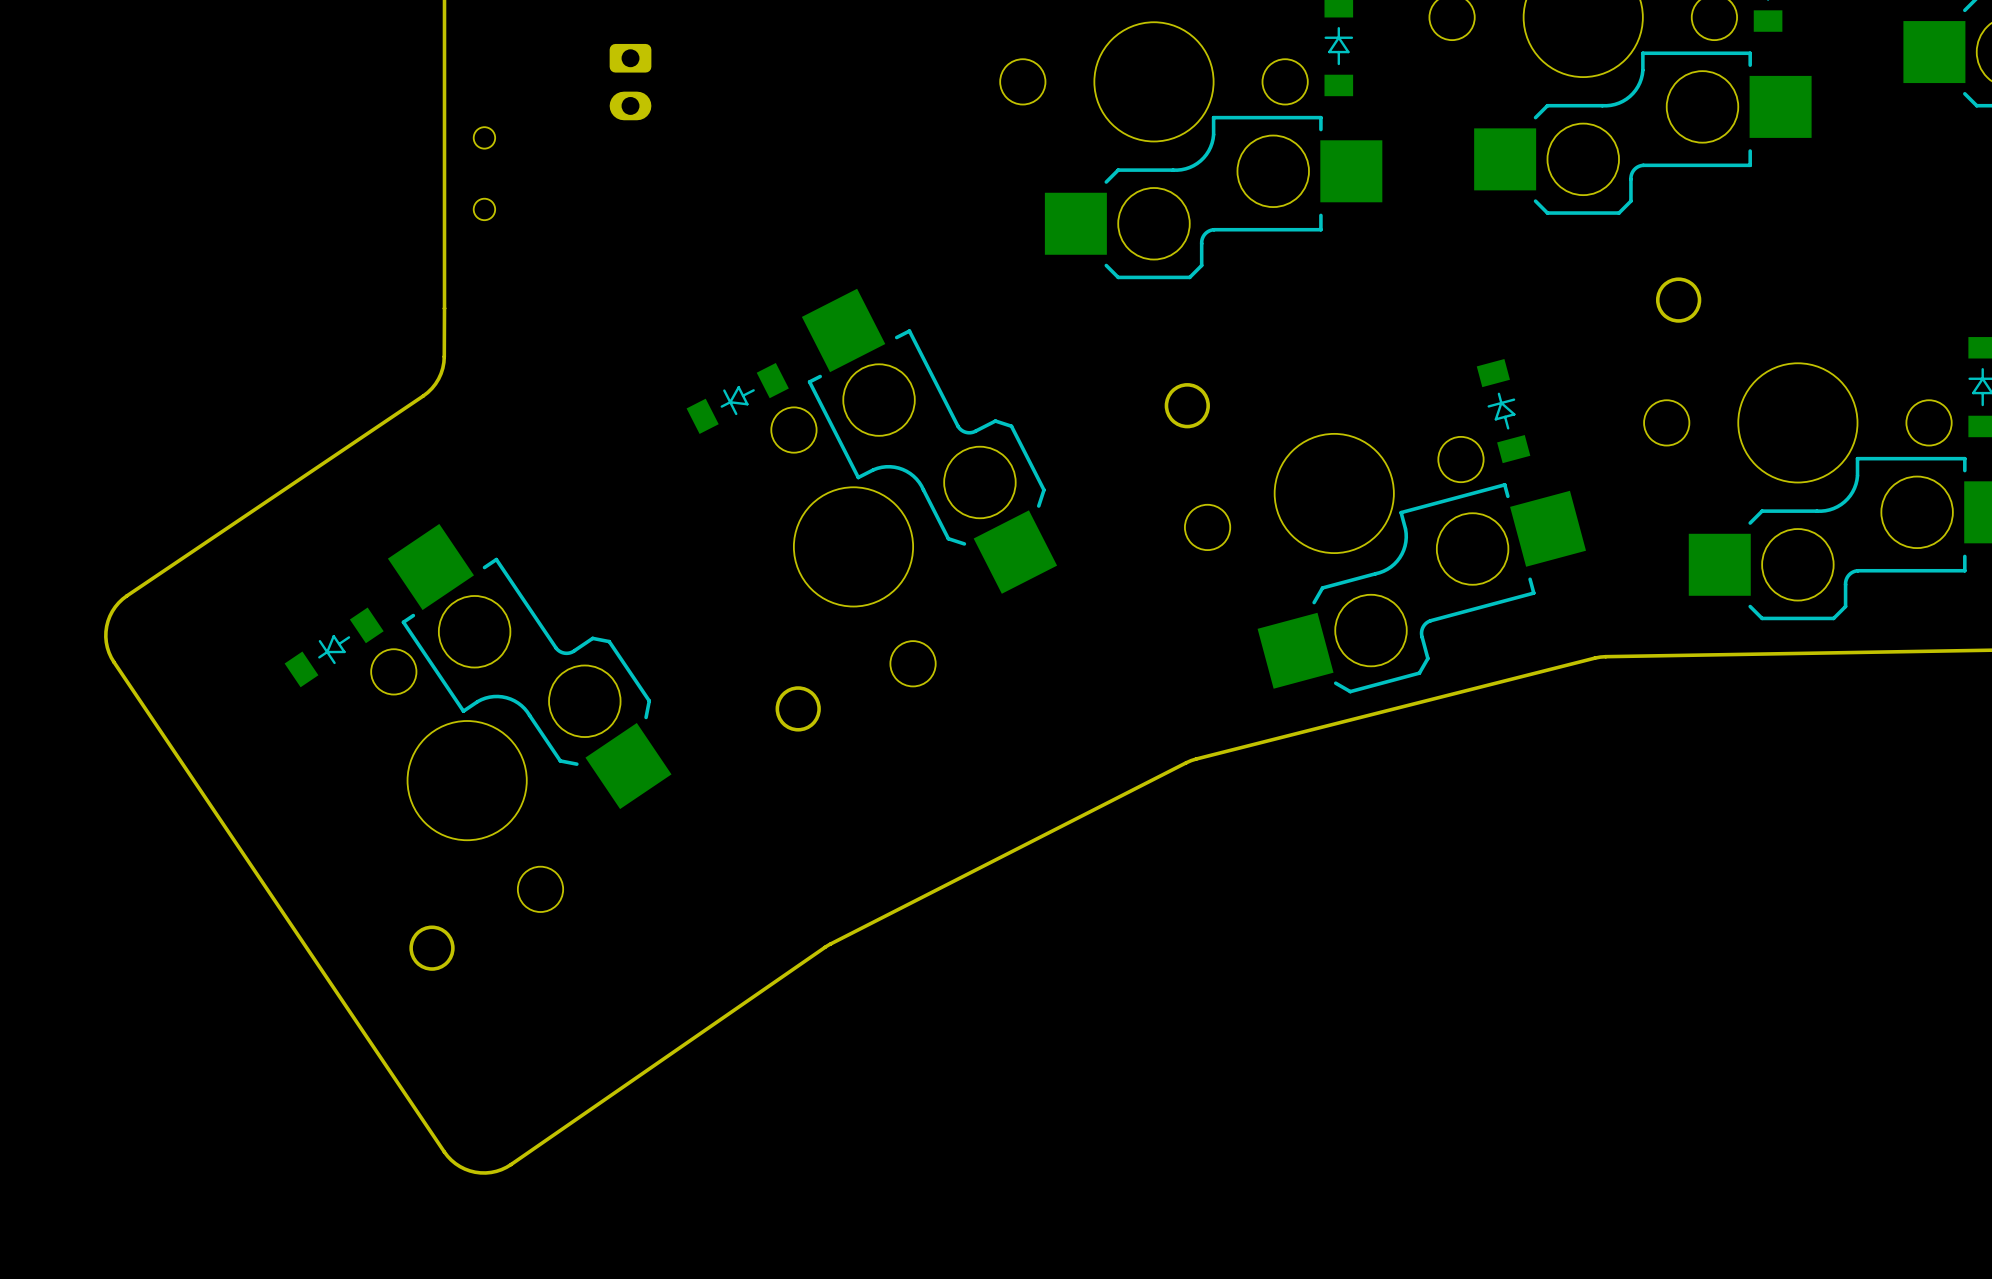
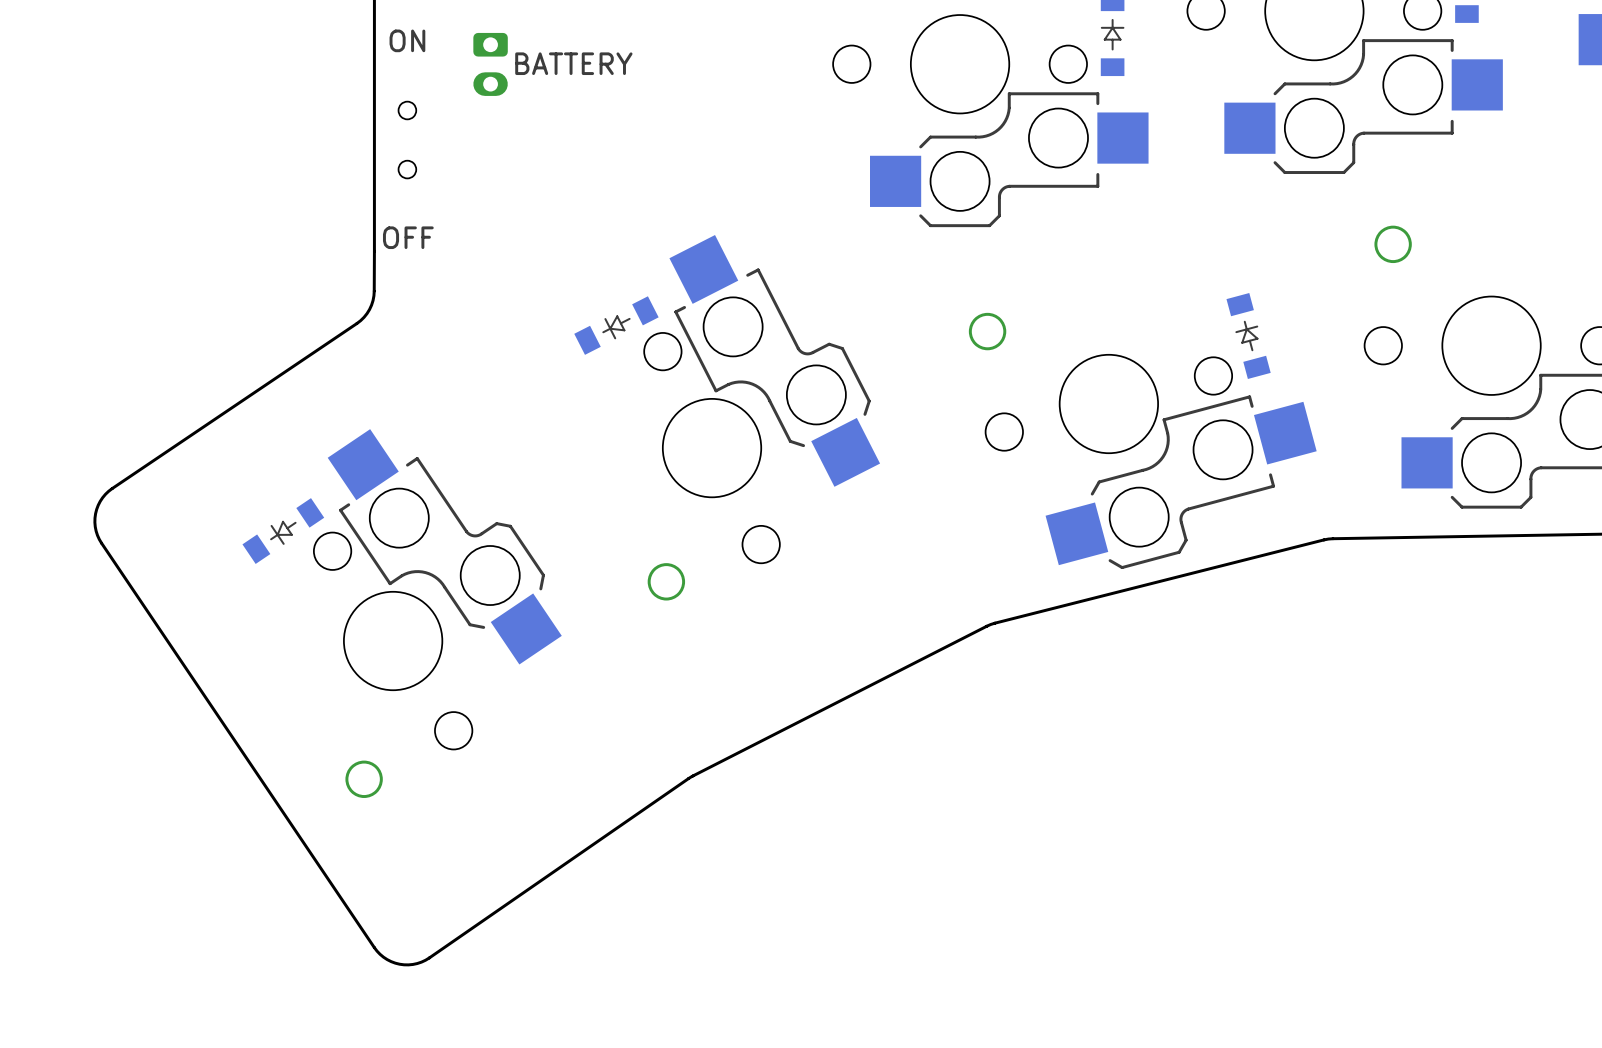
part text: none -> ON (407, 40)
text: none -> BATTERY (573, 63)
part position: (630, 82) -> (490, 64)
part text: none -> OFF (408, 237)

